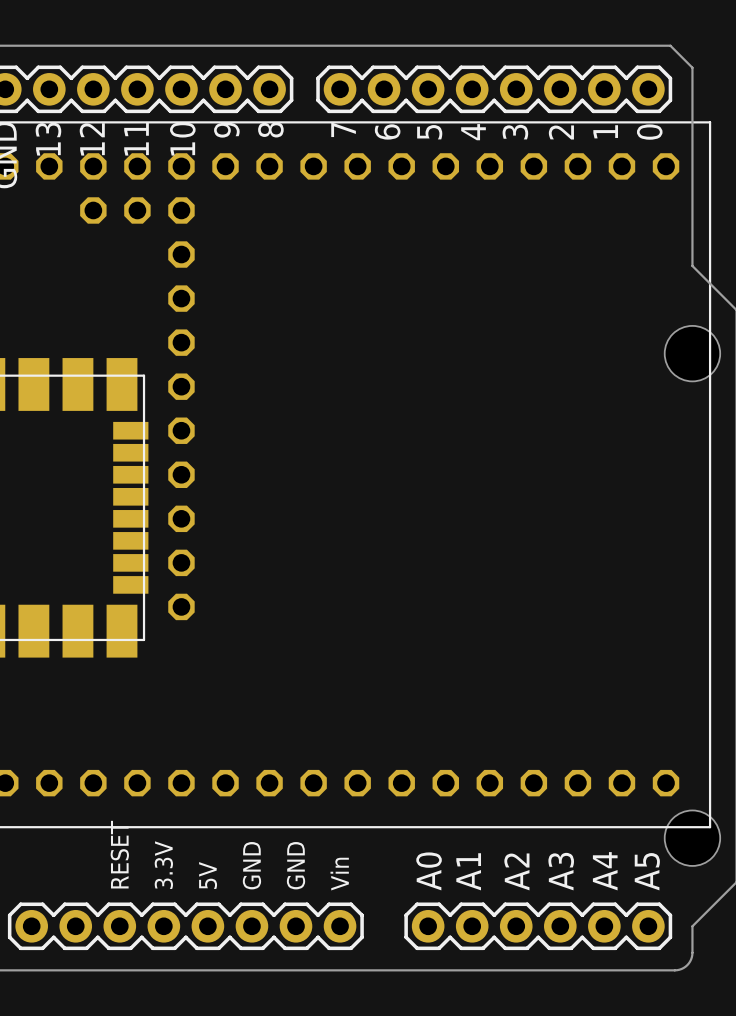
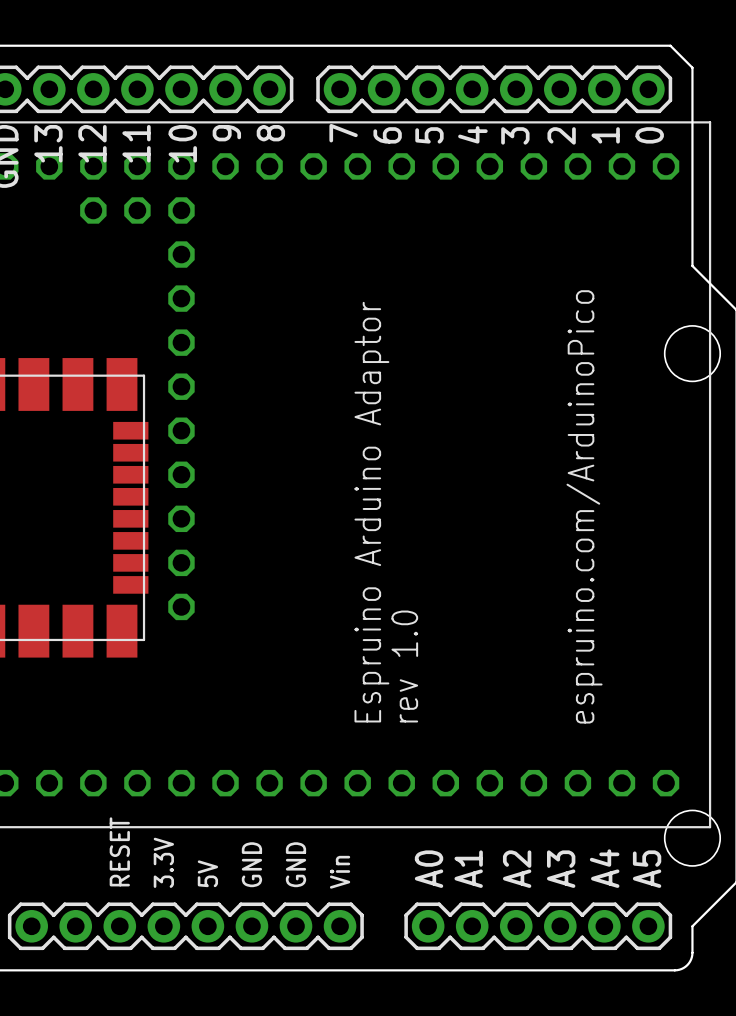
text: none -> espruino.com/ArduinoPico (584, 506)
text: none -> Espruino Arduino Adaptor (371, 512)
text: none -> rev 1.0 (404, 666)

